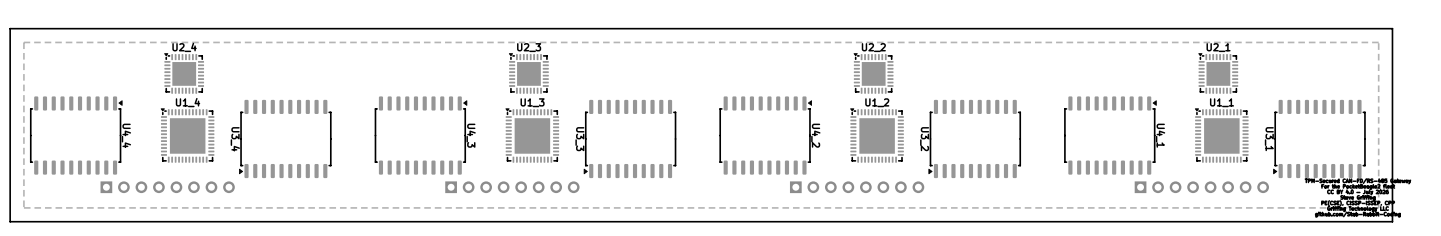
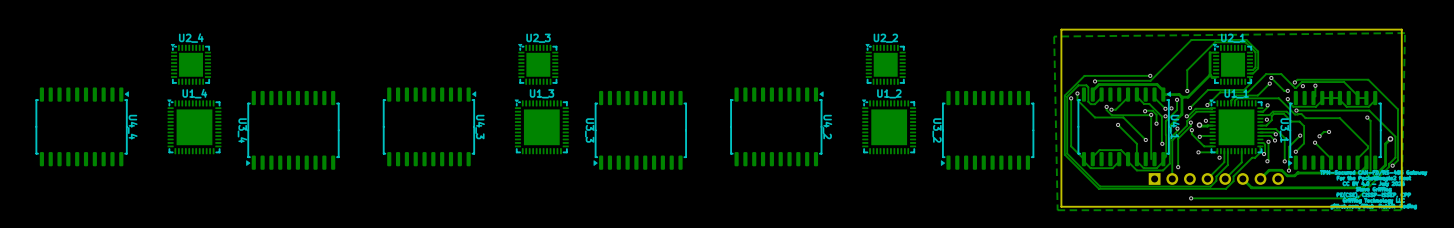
board edge: (1392, 28) (1392, 221) (10, 221) (10, 28) (1392, 28) -> none
board edge: none -> (1401, 29) (1061, 29) (1061, 206) (1401, 206) (1401, 29)
zone outline: (1378, 42) (23, 42) (23, 207) (1378, 207) (1378, 42) -> none
zone outline: none -> (1404, 33) (1054, 36) (1057, 210) (1401, 210) (1404, 33)
track: none -> (1216, 52) (1210, 52) (1210, 75)
track: none -> (1249, 69) (1255, 67) (1255, 52) (1245, 42) (1215, 42) (1187, 70) (1187, 91)
track: none -> (1249, 73) (1253, 73) (1258, 68) (1258, 51) (1246, 39) (1191, 39) (1150, 80) (1095, 81)
track: none -> (1150, 75) (1084, 75) (1064, 95) (1064, 154) (1098, 188) (1225, 188) (1233, 181) (1233, 176) (1252, 157) (1255, 157) (1260, 152) (1260, 146)
via: none -> (1150, 75)
track: none -> (1210, 75) (1212, 77) (1216, 76)
track: none -> (1210, 75) (1188, 97) (1181, 97)
track: none -> (1249, 76) (1249, 84) (1244, 89) (1208, 89) (1190, 107)
track: none -> (1271, 77) (1284, 90) (1287, 90)
via: none -> (1271, 77)
via: none -> (1095, 81)
track: none -> (1294, 82) (1297, 79) (1368, 79) (1397, 109) (1397, 160) (1392, 165)
via: none -> (1294, 82)
track: none -> (1269, 83) (1257, 95) (1236, 95) (1231, 100) (1231, 103)
via: none -> (1269, 83)
track: none -> (1315, 85) (1315, 96) (1313, 98)
via: none -> (1315, 85)
via: none -> (1302, 86)
via: none -> (1187, 91)
via: none -> (1287, 90)
track: none -> (1077, 93) (1077, 100) (1094, 117) (1123, 117) (1145, 139)
via: none -> (1077, 93)
track: none -> (1092, 94) (1092, 90) (1099, 84) (1157, 84) (1163, 90) (1163, 94) (1179, 94) (1181, 97)
track: none -> (1101, 94) (1101, 97) (1094, 104) (1090, 104) (1088, 101) (1088, 87) (1086, 85) (1078, 85) (1067, 96) (1067, 153) (1100, 186) (1210, 186) (1216, 180) (1216, 176) (1227, 165) (1227, 151)
track: none -> (1128, 94) (1128, 97) (1115, 109) (1111, 109)
track: none -> (1136, 94) (1144, 103) (1149, 103) (1161, 116) (1162, 143)
track: none -> (1154, 94) (1154, 97) (1165, 108)
track: none -> (1181, 97) (1181, 114) (1170, 125) (1170, 130)
track: none -> (1366, 98) (1357, 98) (1357, 95) (1344, 82) (1301, 82) (1295, 88) (1281, 74) (1266, 74) (1247, 92) (1220, 92) (1207, 105)
track: none -> (1375, 98) (1368, 106) (1346, 106) (1339, 98) (1322, 98) (1315, 106) (1293, 106) (1287, 99)
track: none -> (1071, 98) (1071, 146) (1090, 168) (1112, 168) (1119, 159)
via: none -> (1071, 98)
via: none -> (1287, 99)
track: none -> (1177, 99) (1177, 109) (1165, 121) (1166, 156) (1156, 168) (1143, 168) (1136, 161) (1136, 143) (1118, 124)
via: none -> (1177, 99)
track: none -> (1234, 103) (1237, 98) (1278, 98) (1295, 114) (1301, 114) (1305, 118) (1339, 118) (1367, 146) (1357, 158) (1357, 162)
via: none -> (1207, 105)
track: none -> (1267, 105) (1263, 111) (1260, 111)
via: none -> (1267, 105)
track: none -> (1106, 106) (1106, 110) (1111, 115) (1151, 115)
via: none -> (1106, 106)
via: none -> (1190, 107)
via: none -> (1165, 108)
via: none -> (1171, 108)
track: none -> (1212, 108) (1195, 108) (1186, 116)
via: none -> (1111, 109)
track: none -> (1296, 110) (1369, 110) (1395, 136) (1395, 157) (1388, 164) (1388, 166) (1357, 198) (1191, 198)
via: none -> (1296, 110)
track: none -> (1145, 111) (1152, 110) (1156, 114) (1156, 123)
via: none -> (1145, 111)
track: none -> (1212, 111) (1196, 111) (1187, 121) (1187, 125) (1172, 140) (1172, 178)
track: none -> (1151, 114) (1151, 159)
via: none -> (1151, 114)
track: none -> (1289, 114) (1286, 111) (1272, 111) (1269, 115) (1260, 115)
via: none -> (1165, 116)
via: none -> (1186, 116)
track: none -> (1367, 117) (1370, 120) (1370, 173) (1366, 177)
via: none -> (1367, 117)
via: none -> (1266, 119)
via: none -> (1205, 120)
track: none -> (1190, 122) (1190, 126) (1178, 138) (1178, 167)
via: none -> (1190, 122)
via: none -> (1156, 123)
via: none -> (1118, 124)
track: none -> (1199, 125) (1212, 125)
via: none -> (1199, 125)
track: none -> (1260, 125) (1266, 125) (1271, 120) (1273, 113) (1283, 113) (1291, 121) (1299, 121) (1304, 126) (1304, 143) (1295, 151)
track: none -> (1177, 128) (1169, 138) (1169, 163) (1163, 170) (1136, 170) (1128, 161) (1128, 157) (1121, 150) (1099, 150) (1092, 159)
via: none -> (1177, 128)
track: none -> (1260, 129) (1275, 129) (1284, 138) (1284, 161)
track: none -> (1191, 130) (1191, 134) (1204, 146) (1212, 146)
via: none -> (1191, 130)
track: none -> (1329, 131) (1323, 131) (1319, 136)
via: none -> (1329, 131)
track: none -> (1260, 132) (1273, 132) (1275, 134)
via: none -> (1275, 134)
track: none -> (1212, 135) (1199, 136)
track: none -> (1260, 135) (1270, 135) (1275, 140)
track: none -> (1300, 135) (1288, 146) (1288, 170)
via: none -> (1300, 135)
via: none -> (1319, 136)
via: none -> (1199, 136)
track: none -> (1390, 138) (1385, 143) (1385, 165) (1362, 187) (1251, 187) (1242, 178)
via: none -> (1390, 138)
via: none -> (1145, 139)
via: none -> (1275, 140)
track: none -> (1268, 141) (1267, 161)
via: none -> (1268, 141)
track: none -> (1260, 142) (1265, 144) (1264, 154)
track: none -> (1315, 142) (1331, 158) (1331, 162)
via: none -> (1315, 142)
via: none -> (1162, 143)
track: none -> (1217, 151) (1198, 152)
track: none -> (1224, 151) (1224, 162) (1207, 178)
track: none -> (1241, 151) (1241, 162) (1225, 178)
via: none -> (1198, 152)
via: none -> (1295, 151)
via: none -> (1264, 154)
via: none -> (1219, 157)
via: none -> (1267, 161)
via: none -> (1284, 161)
track: none -> (1366, 162) (1366, 166) (1359, 173) (1298, 172) (1294, 175) (1287, 175) (1281, 170) (1269, 170) (1260, 178)
via: none -> (1392, 165)
via: none -> (1178, 167)
via: none -> (1288, 170)
part: (167, 187) -> none
part: (512, 187) -> none
part: (857, 187) -> none
via: none -> (1191, 198)

